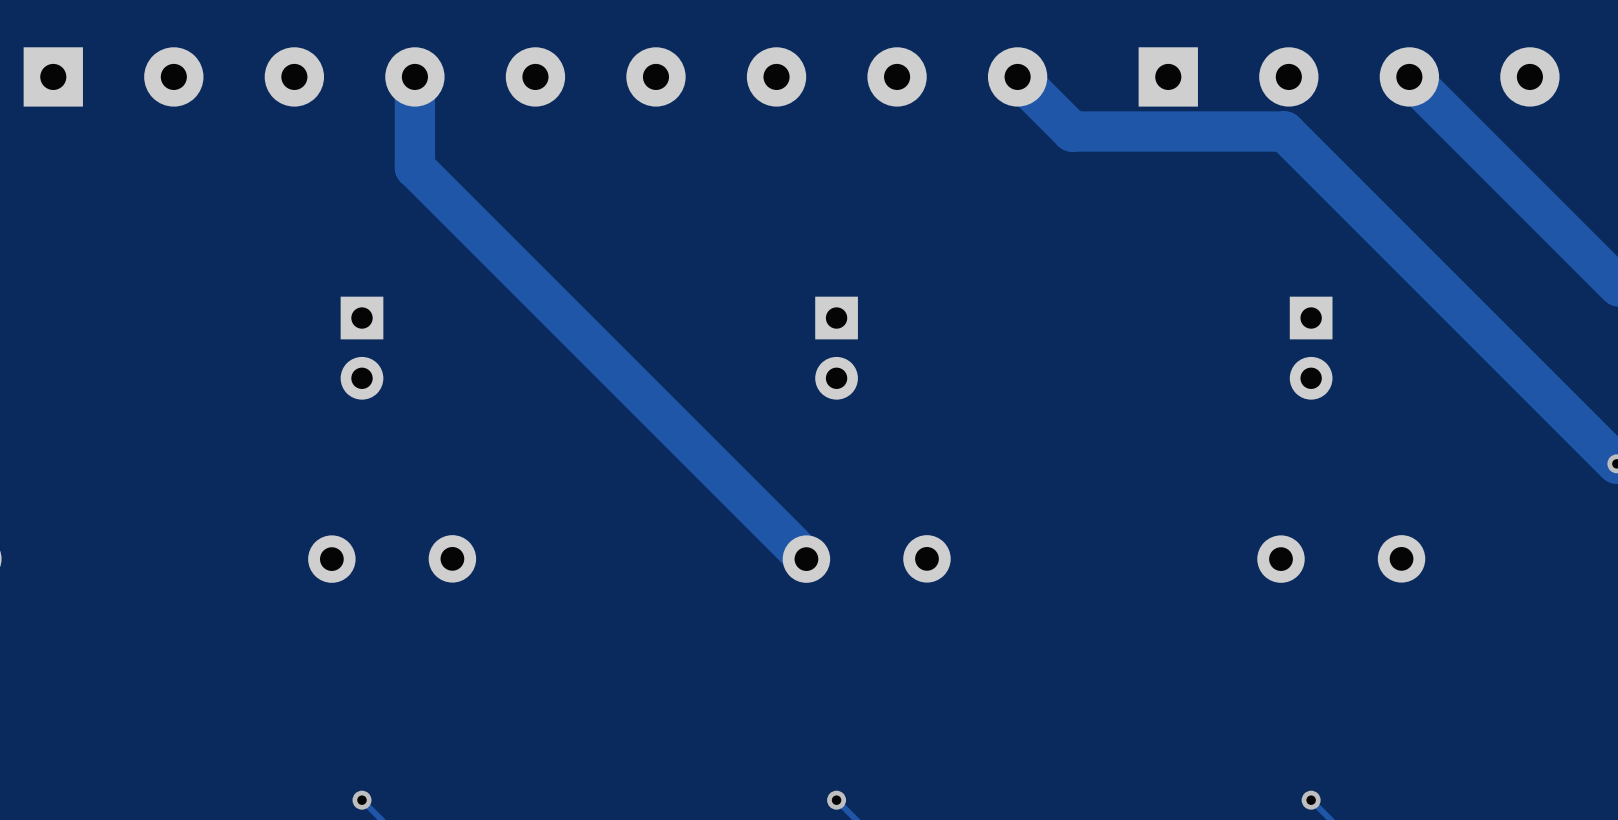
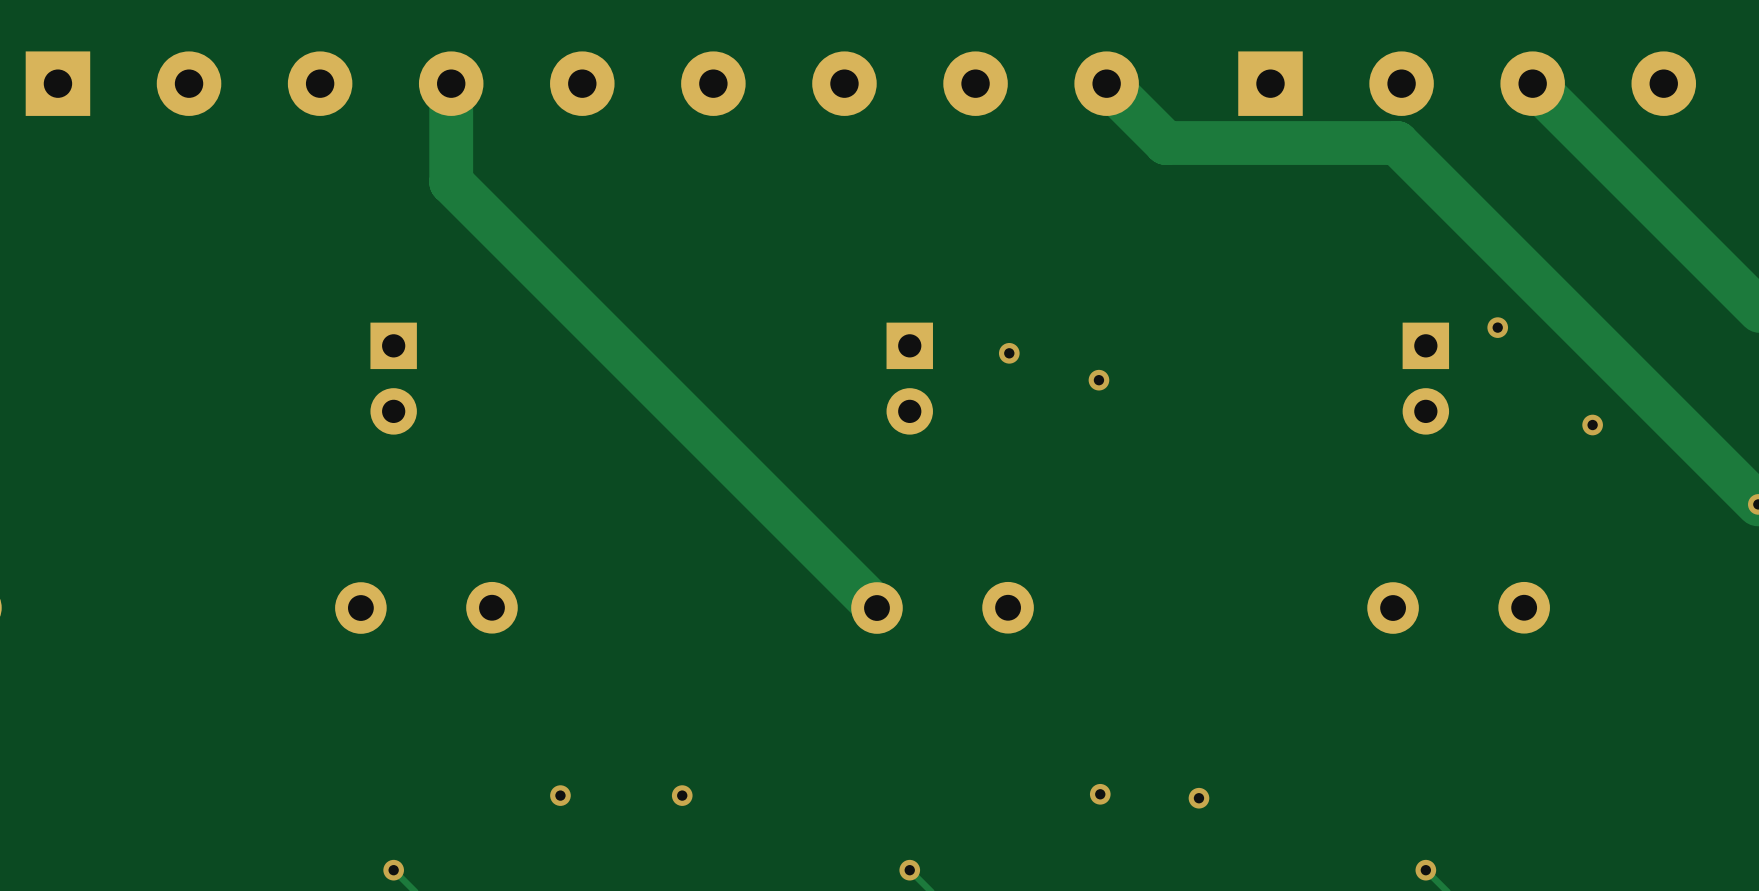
via: none -> (1497, 327)
via: none -> (1009, 353)
via: none -> (1098, 380)
via: none -> (1592, 425)
via: none -> (1100, 794)
via: none -> (560, 795)
via: none -> (682, 795)
via: none -> (1198, 798)

